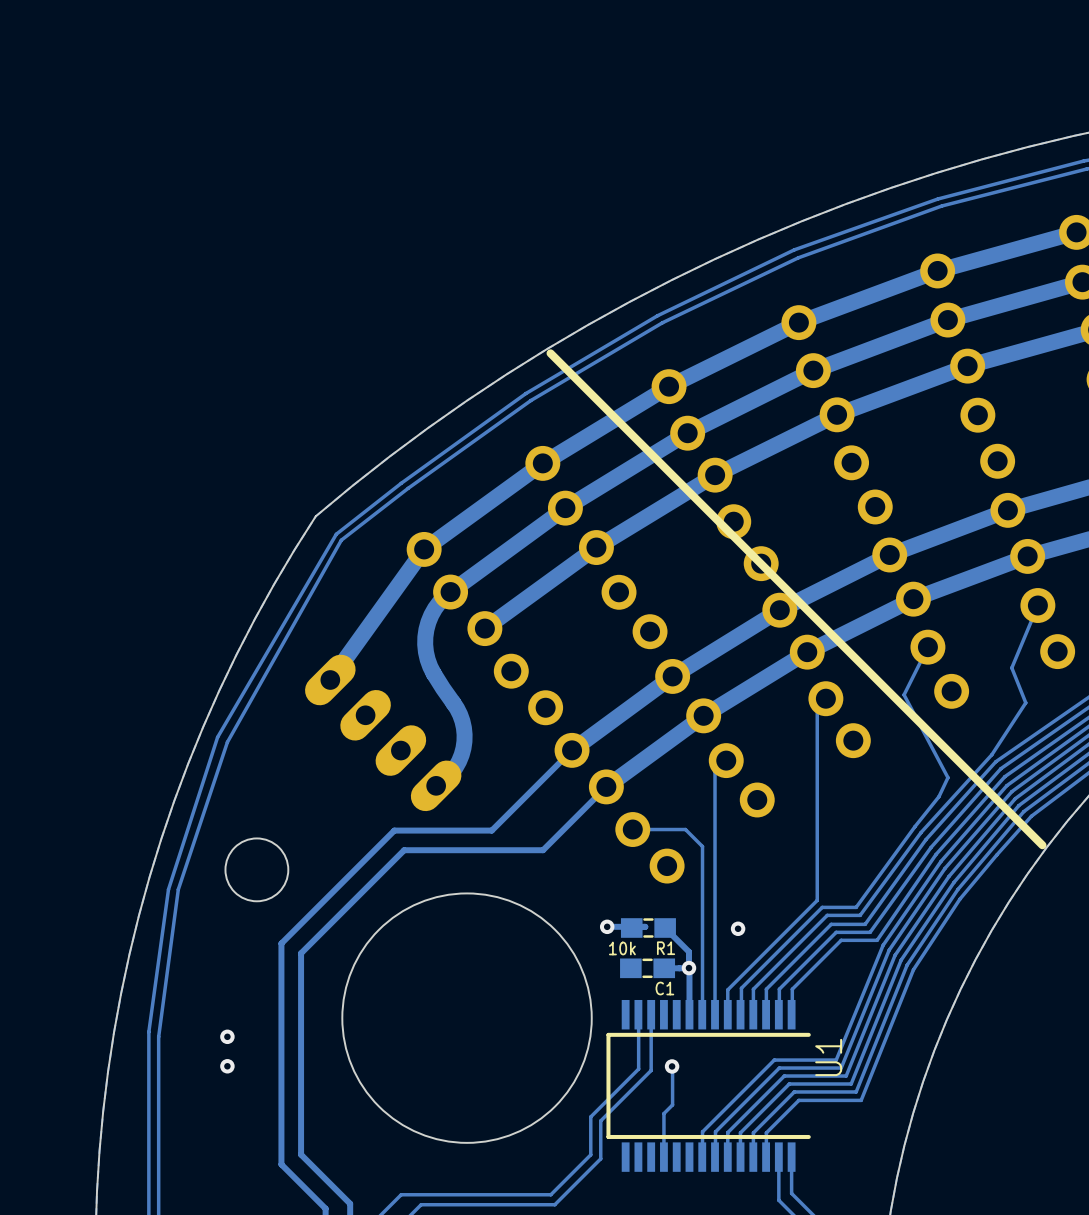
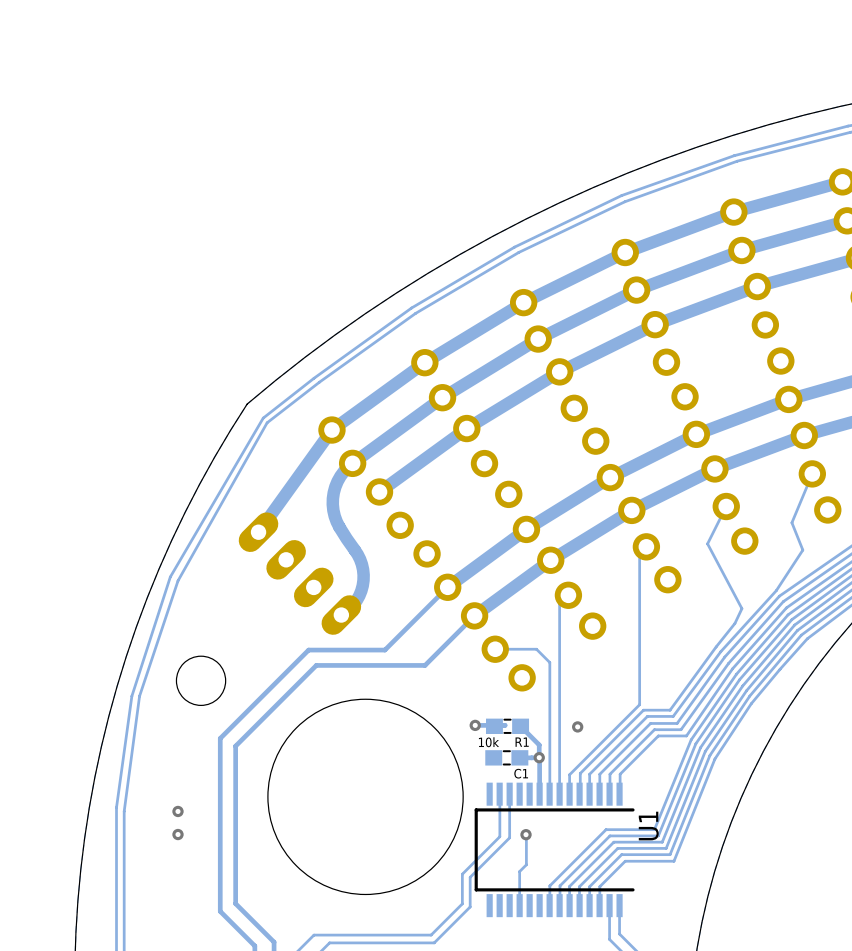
line: (550, 353) (1042, 845) -> none

